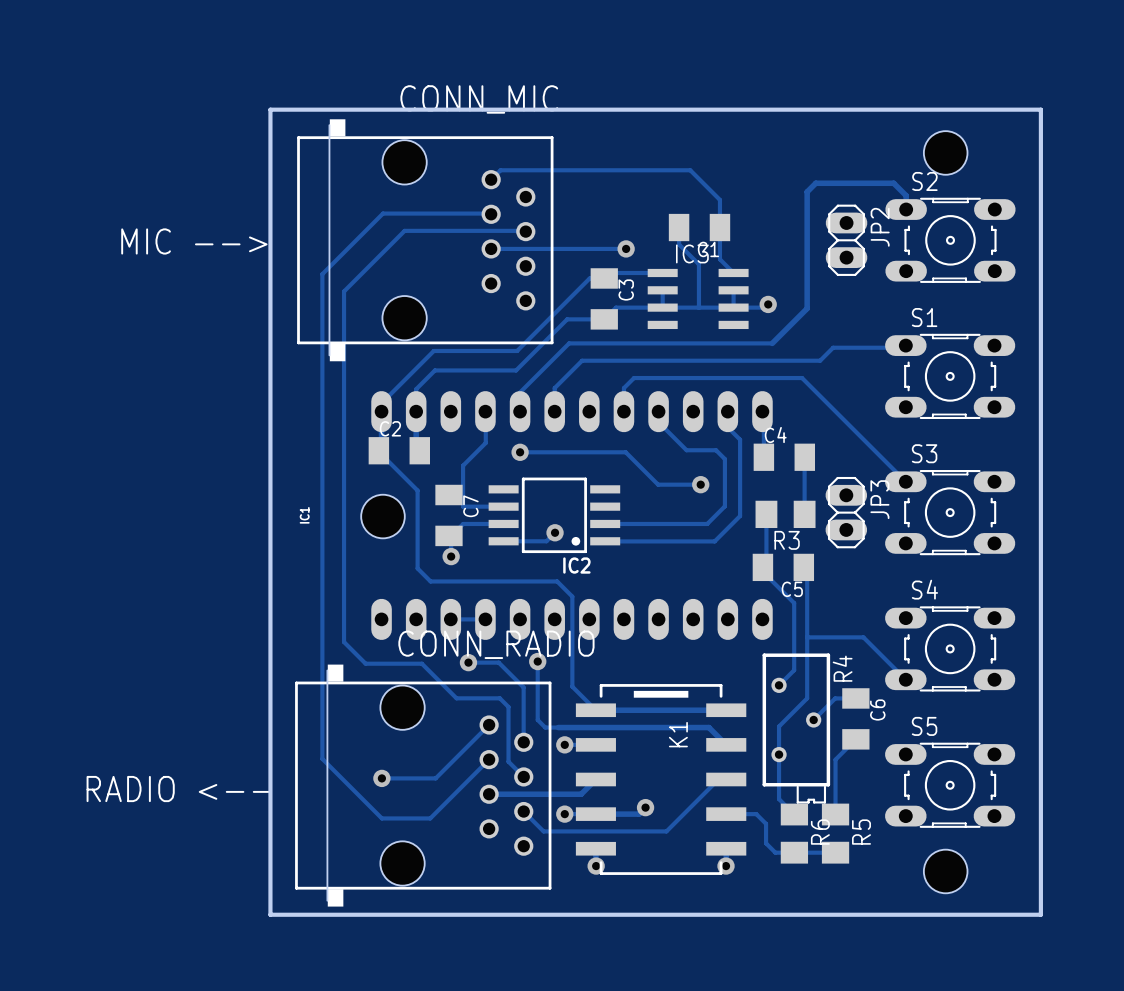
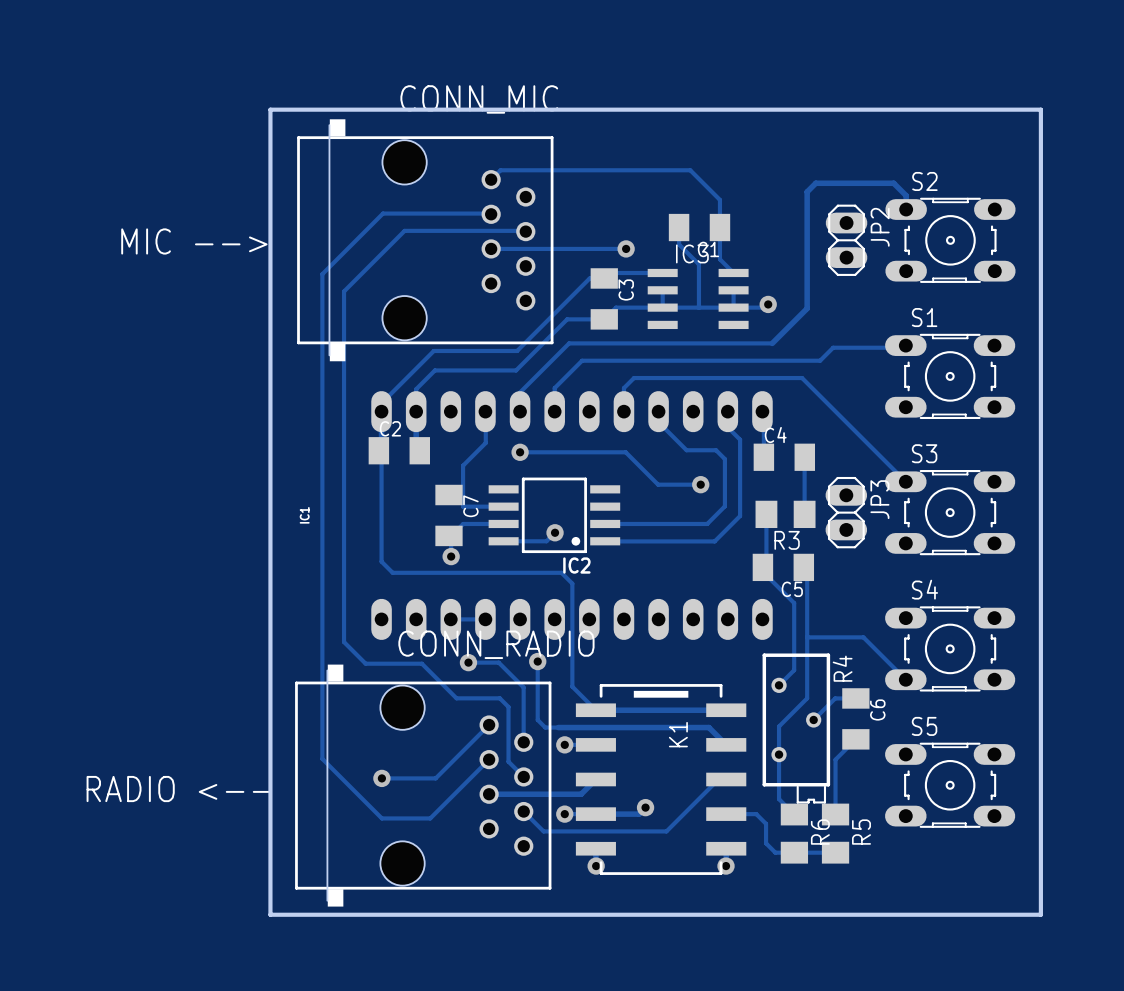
hole: (945, 152) -> none
track: (378, 450) (417, 490) (417, 568) (430, 581) (557, 581) (572, 596) -> (381, 450) (381, 561) (392, 572) (561, 572) (572, 583) (572, 596)
hole: (382, 516) -> none
hole: (945, 871) -> none

